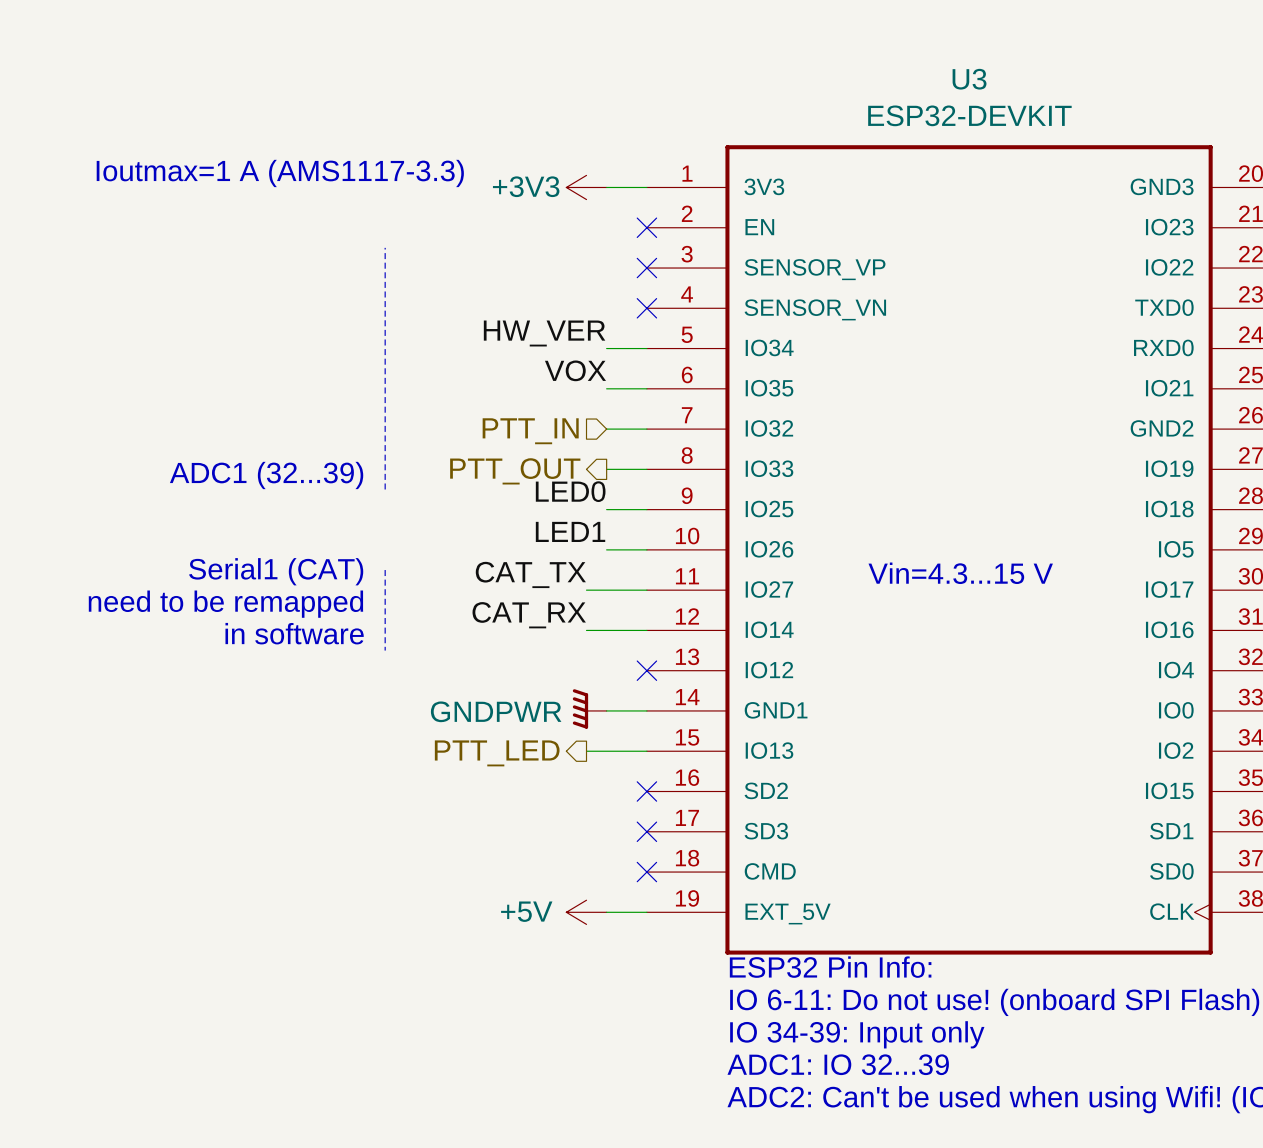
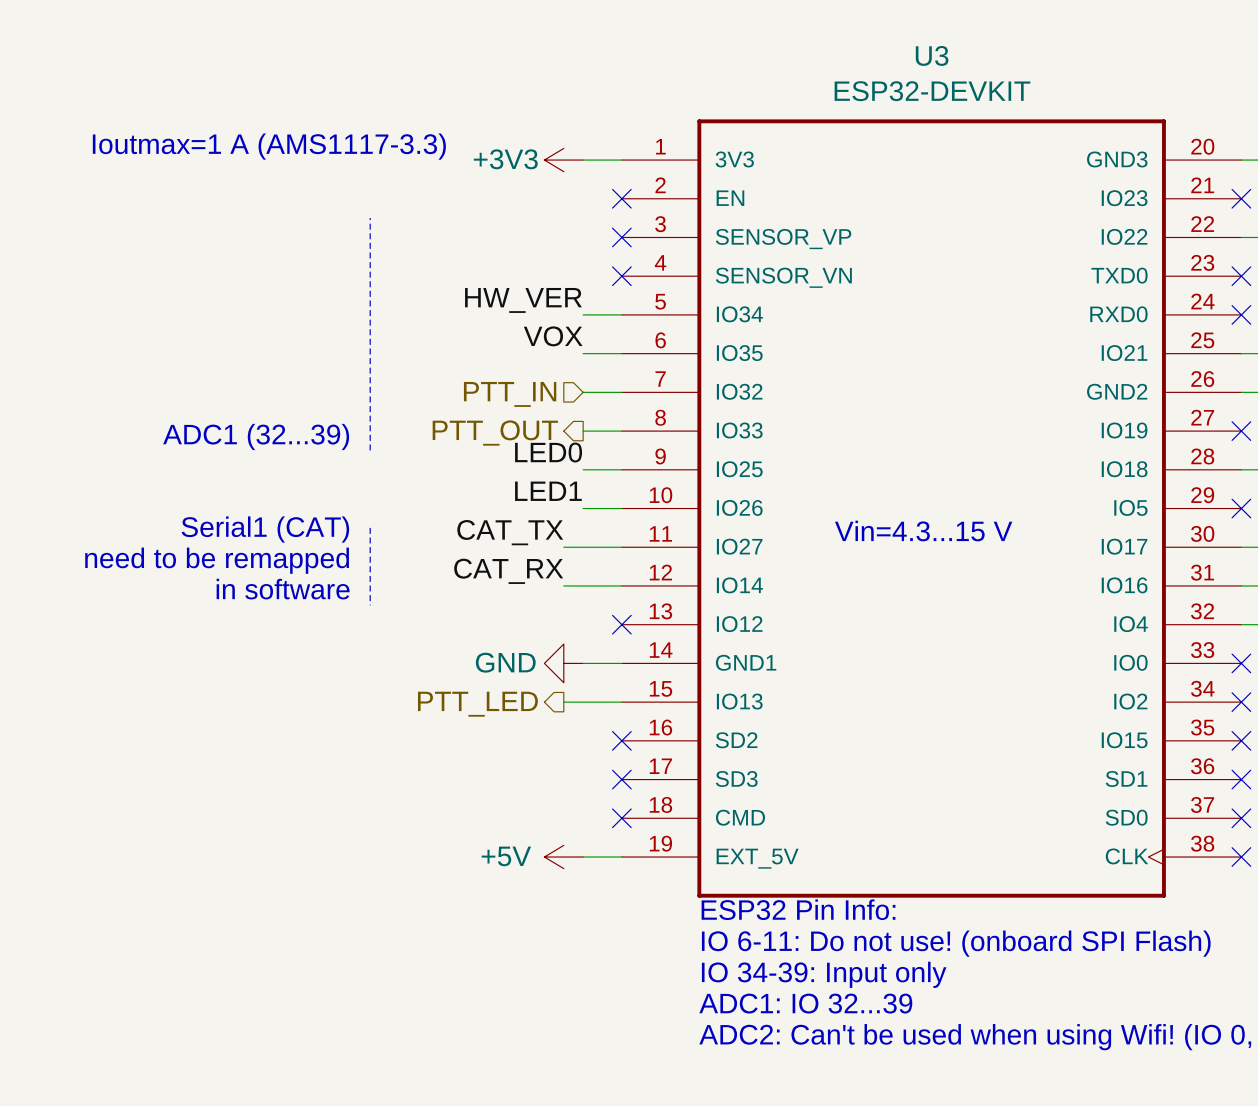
power symbol: GNDPWR (589, 708) -> GND (563, 663)

